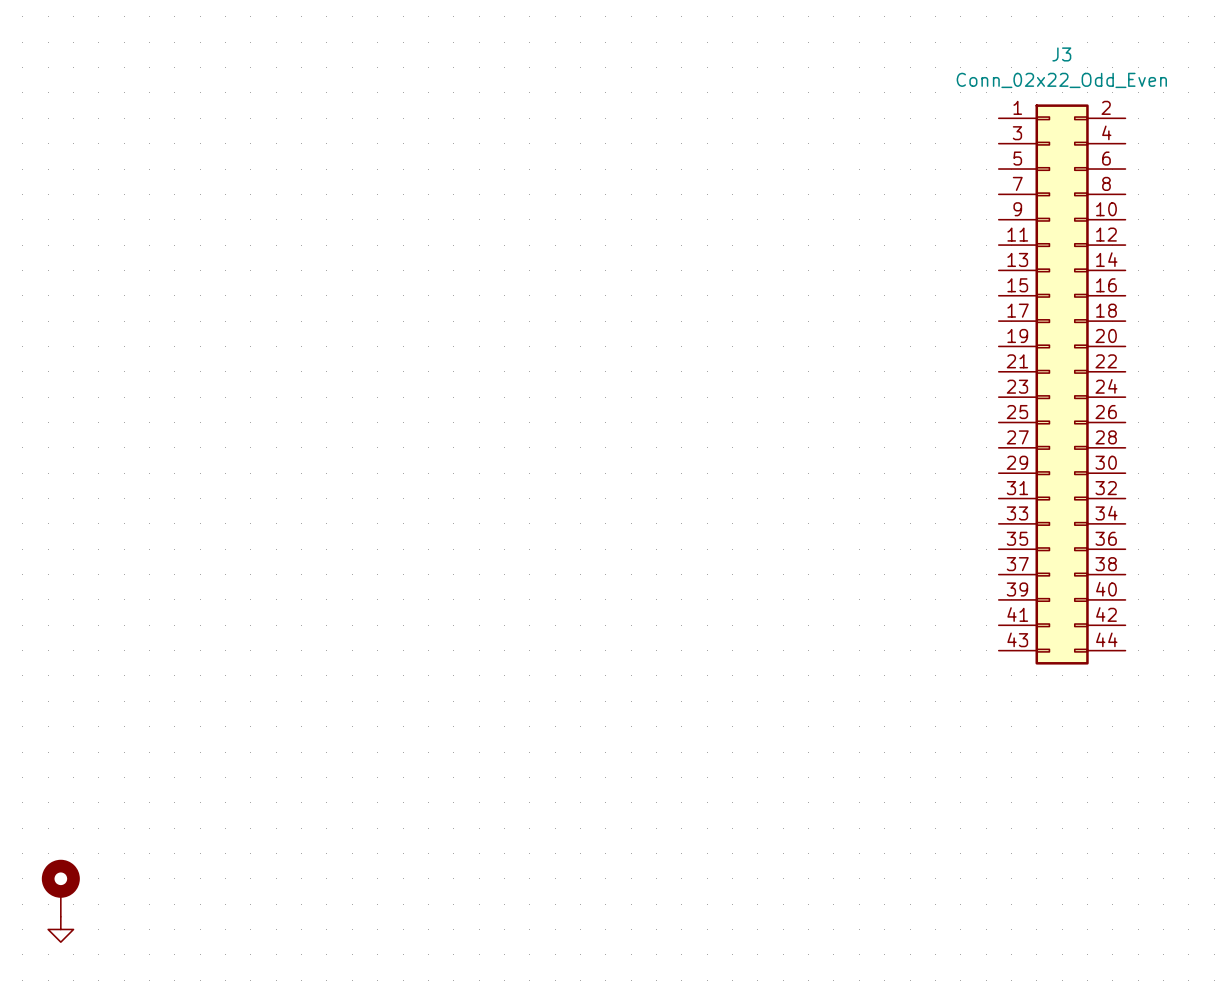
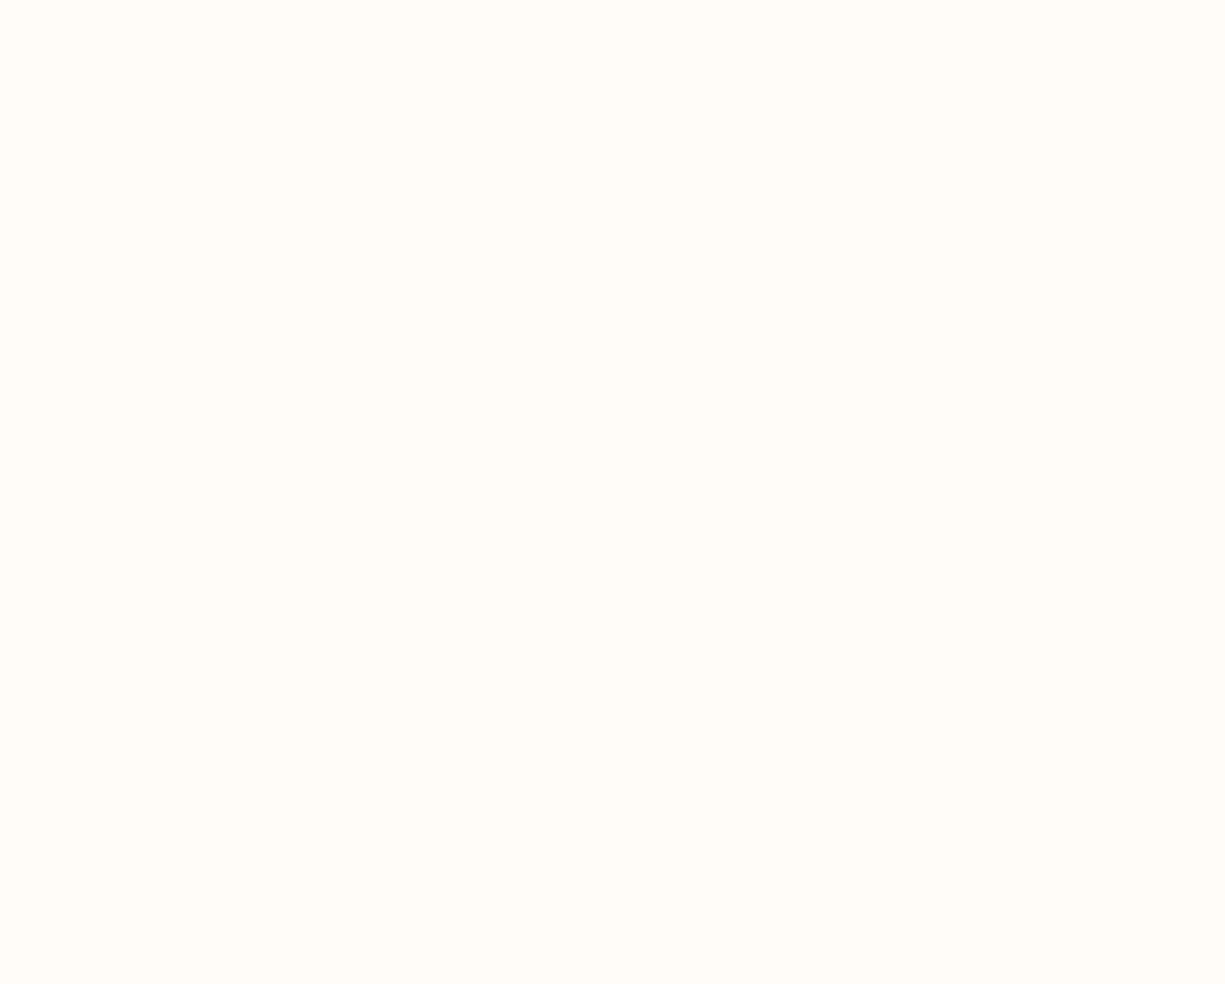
J3: Conn_02x22_Odd_Even (1062, 384) -> none
part: (60, 888) -> none
power symbol: (60, 929) -> none

